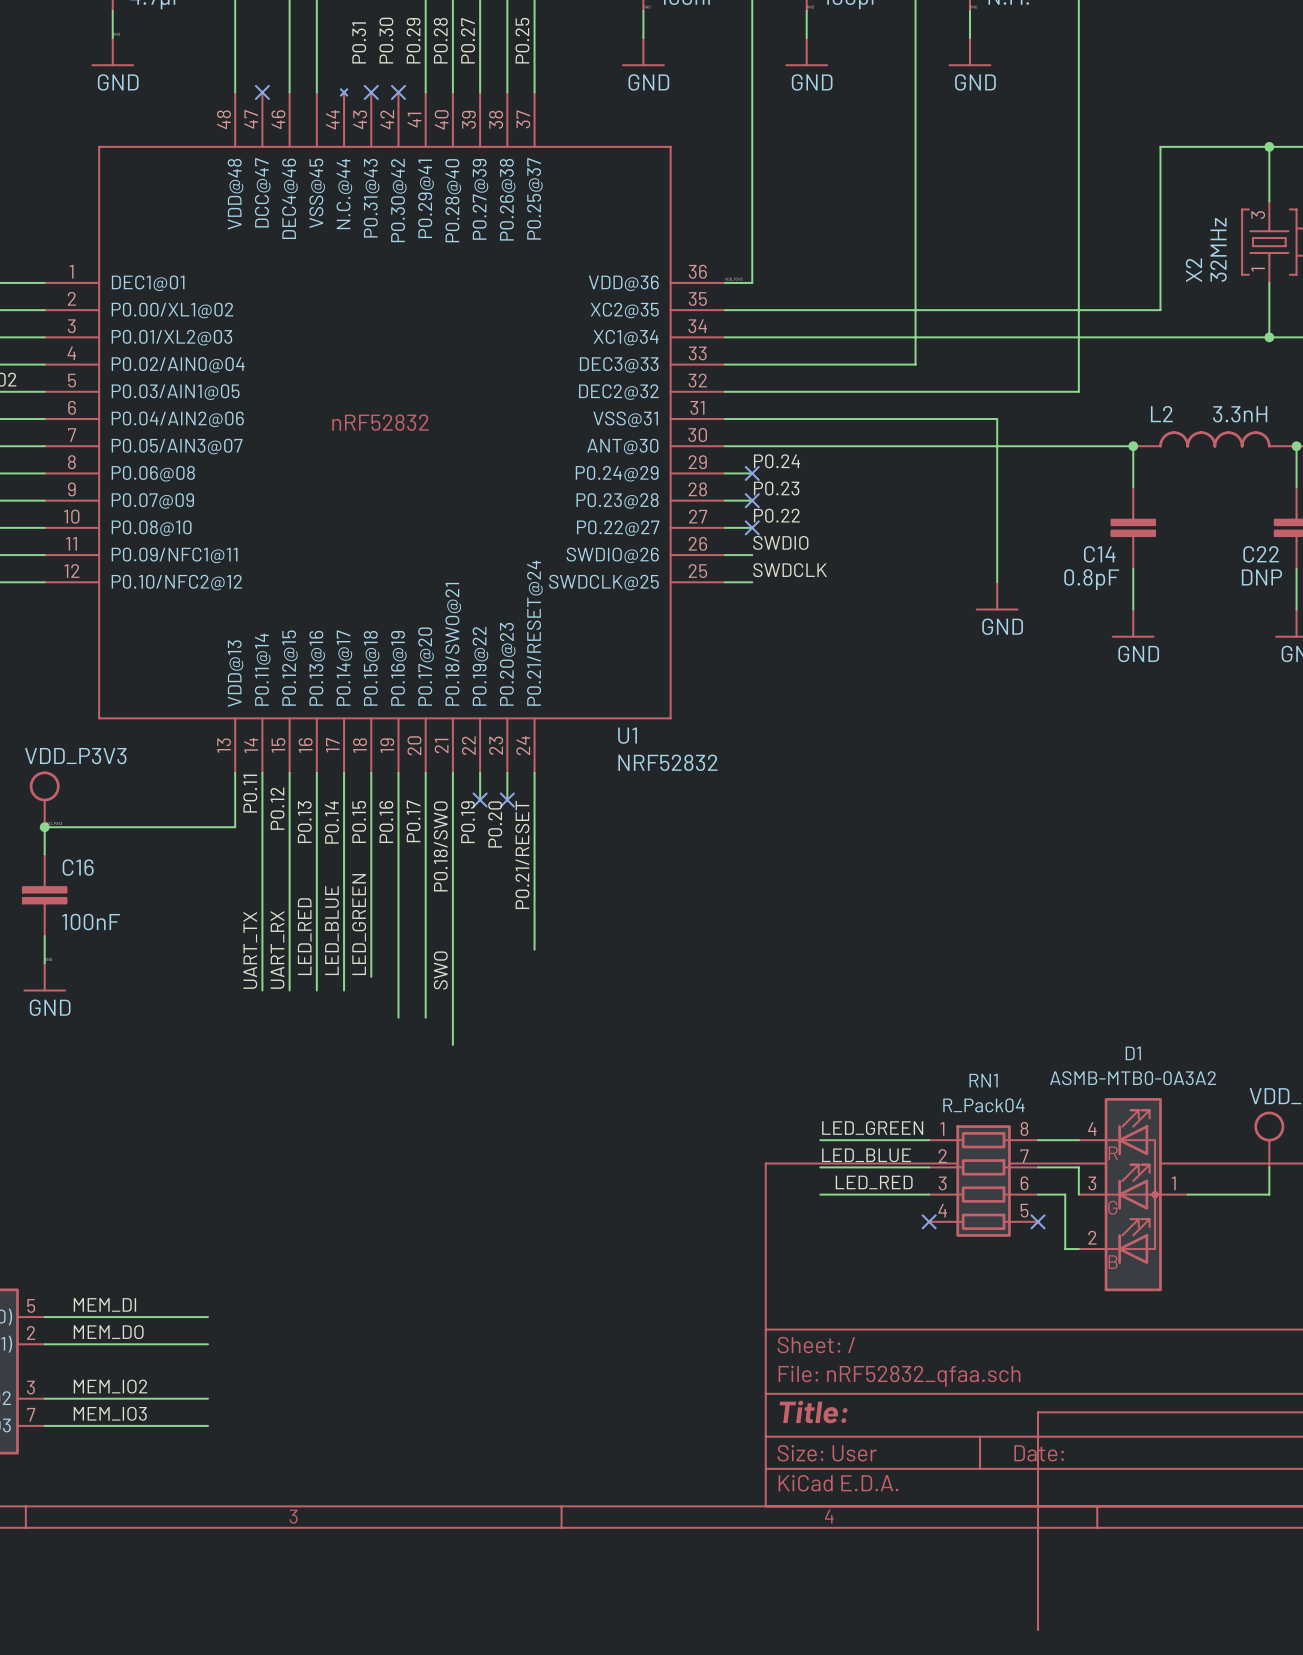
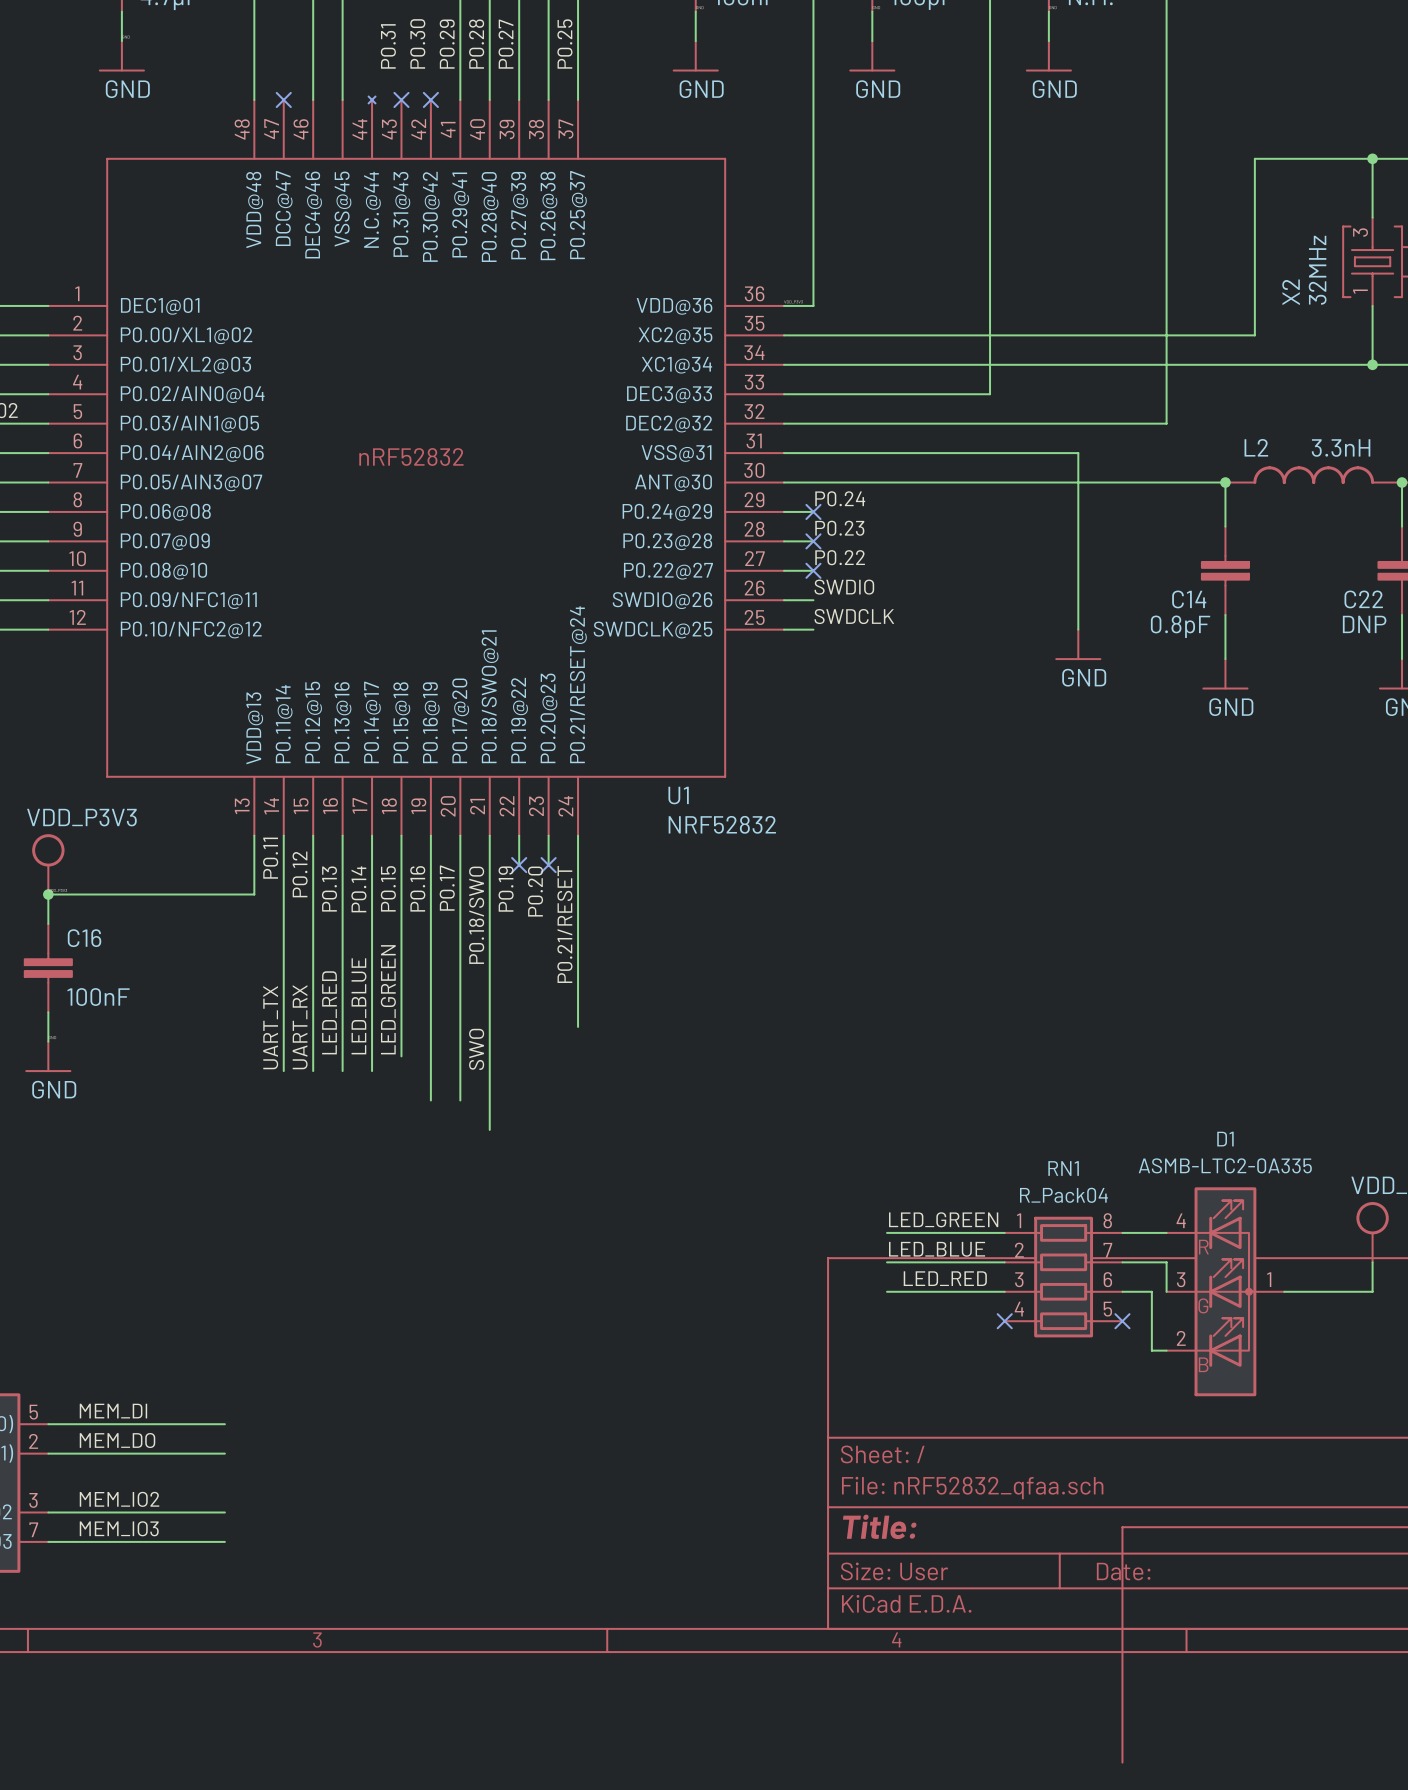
D1 value: ASMB-MTB0-0A3A2 (1133, 1078) -> ASMB-LTC2-0A335 (1225, 1165)

